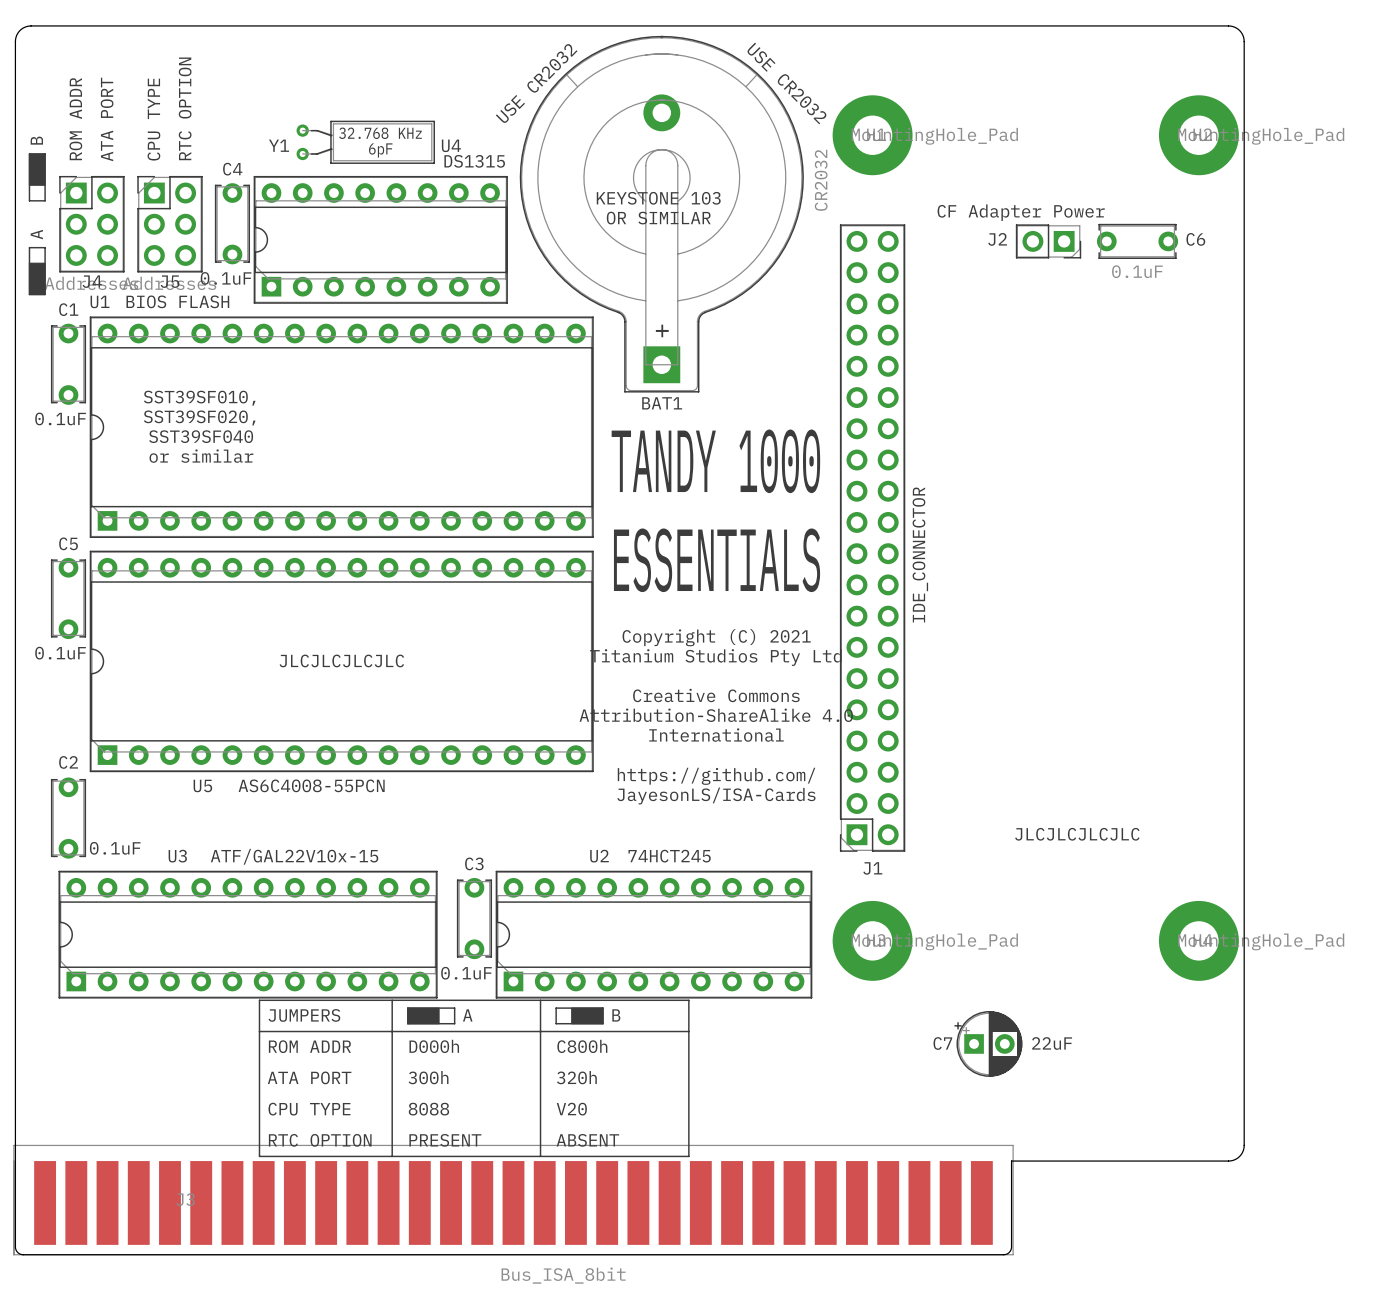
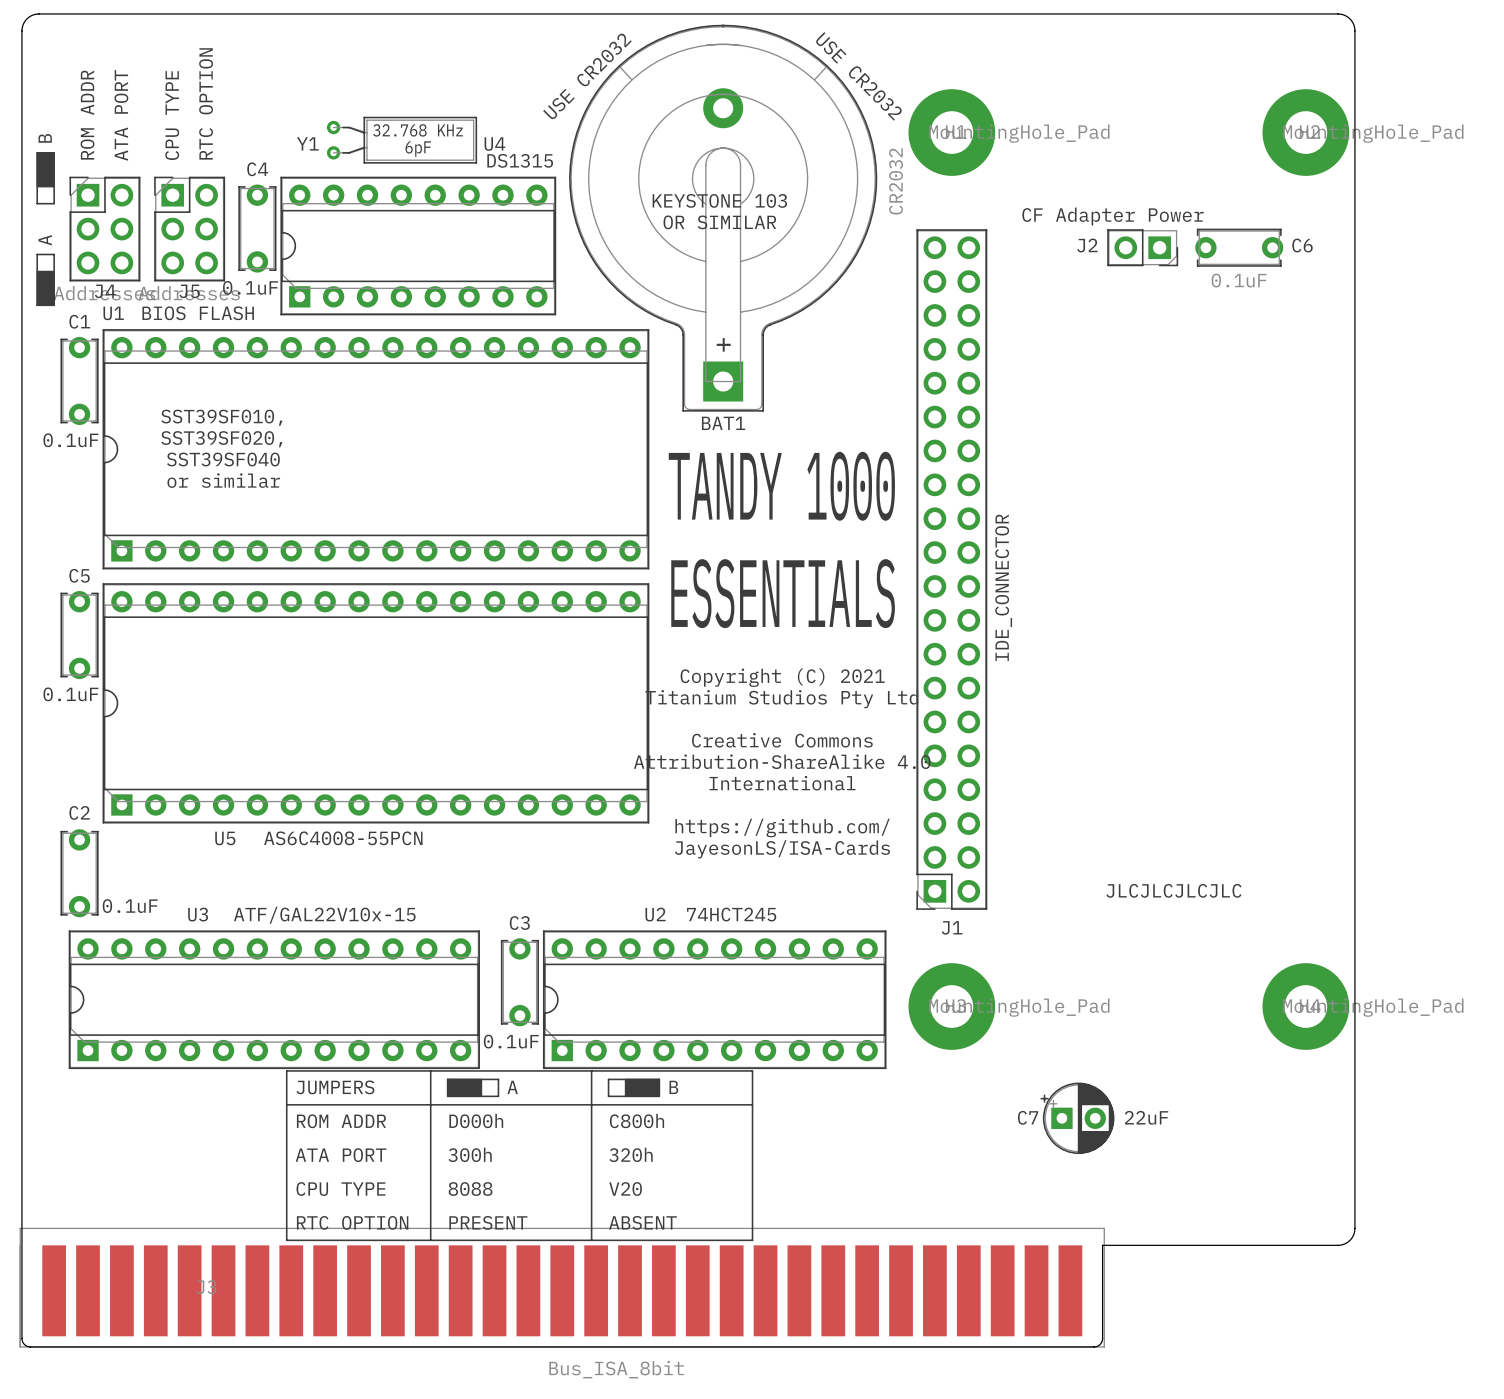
text: JLCJLCJLCJLC (341, 660) -> none

